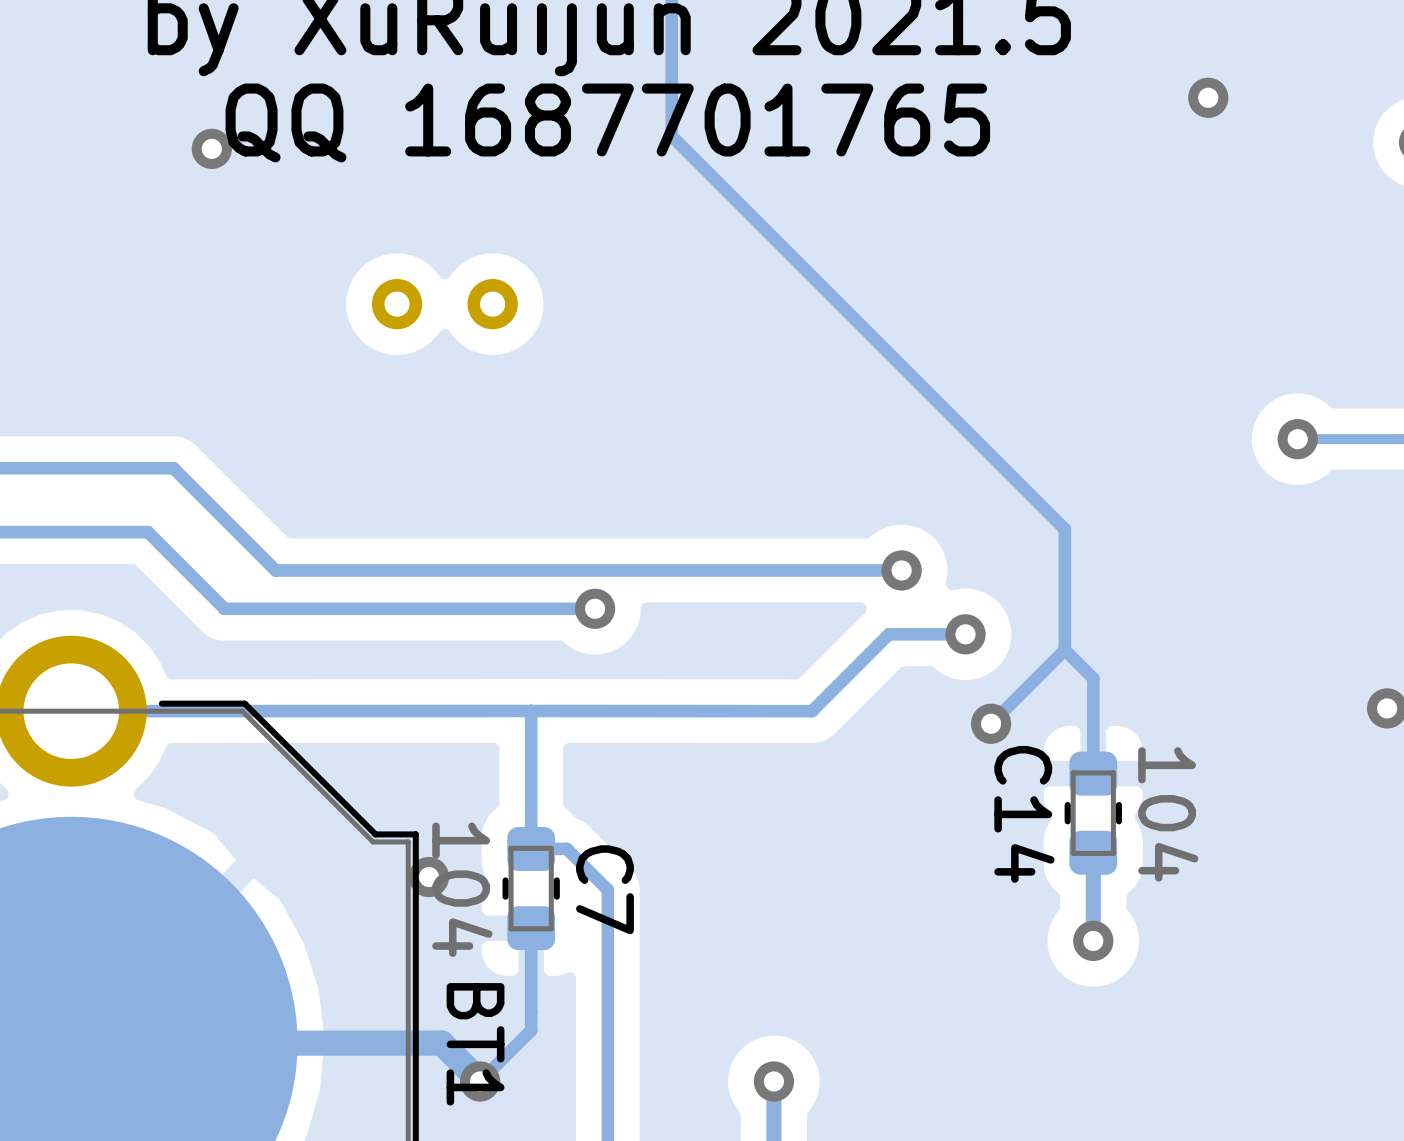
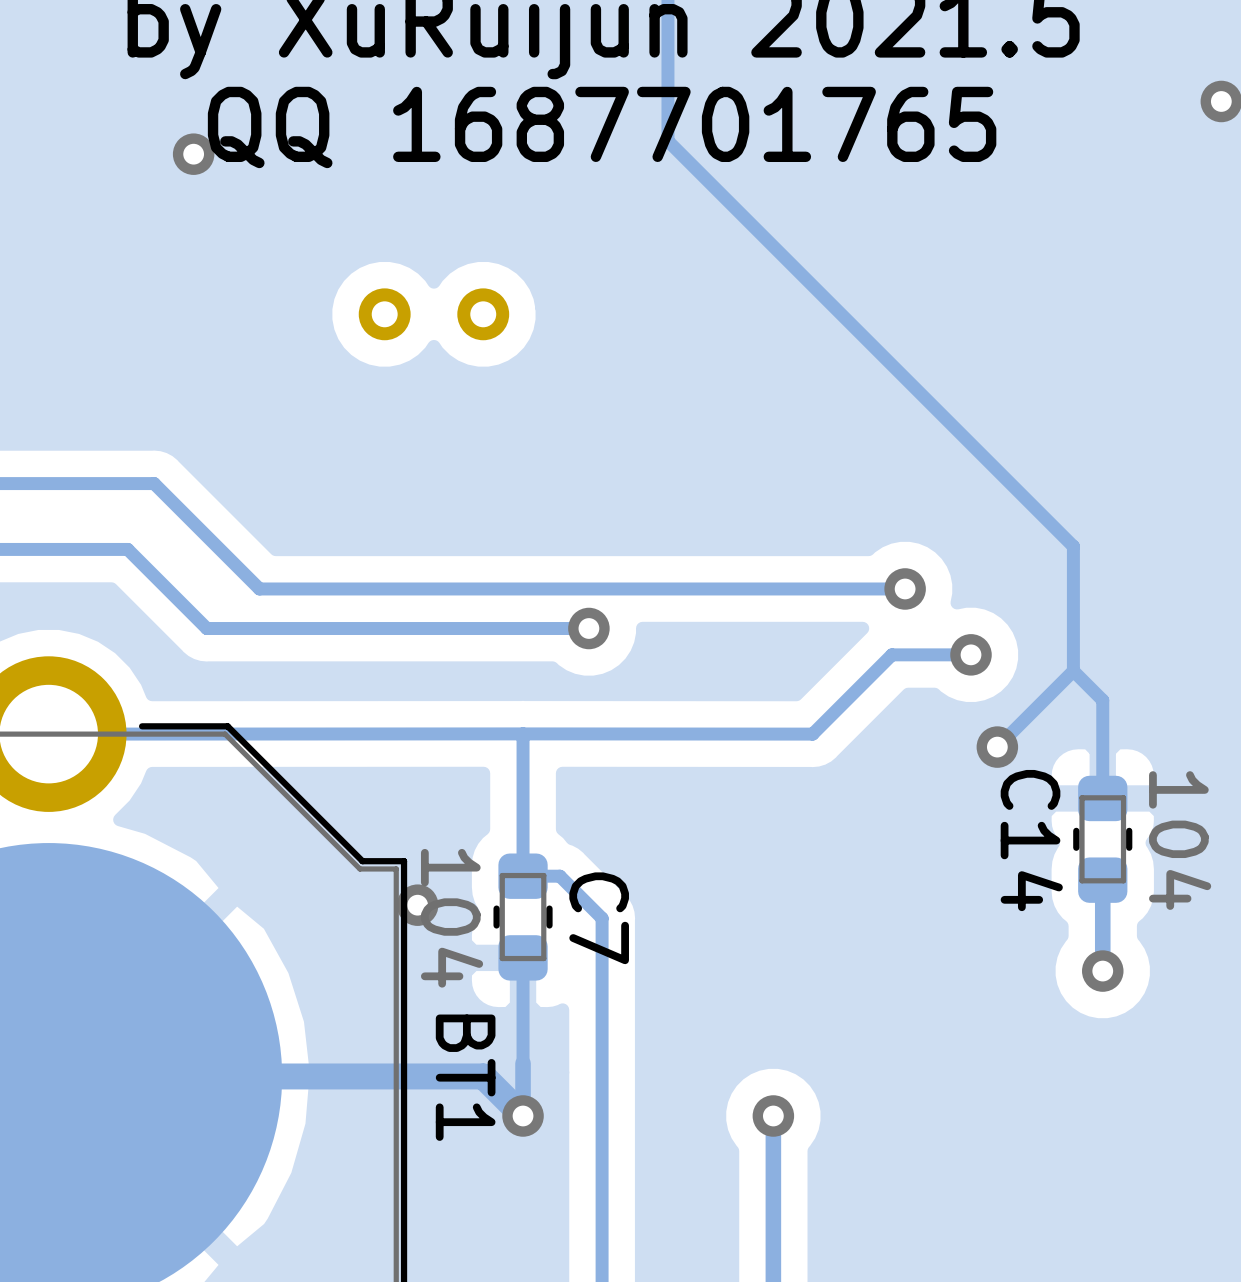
track: (531, 1030) (480, 1081) (441, 1043) -> (523, 1063) (523, 1115) (483, 1076) (430, 1076)
via position: (480, 1081) -> (523, 1115)

